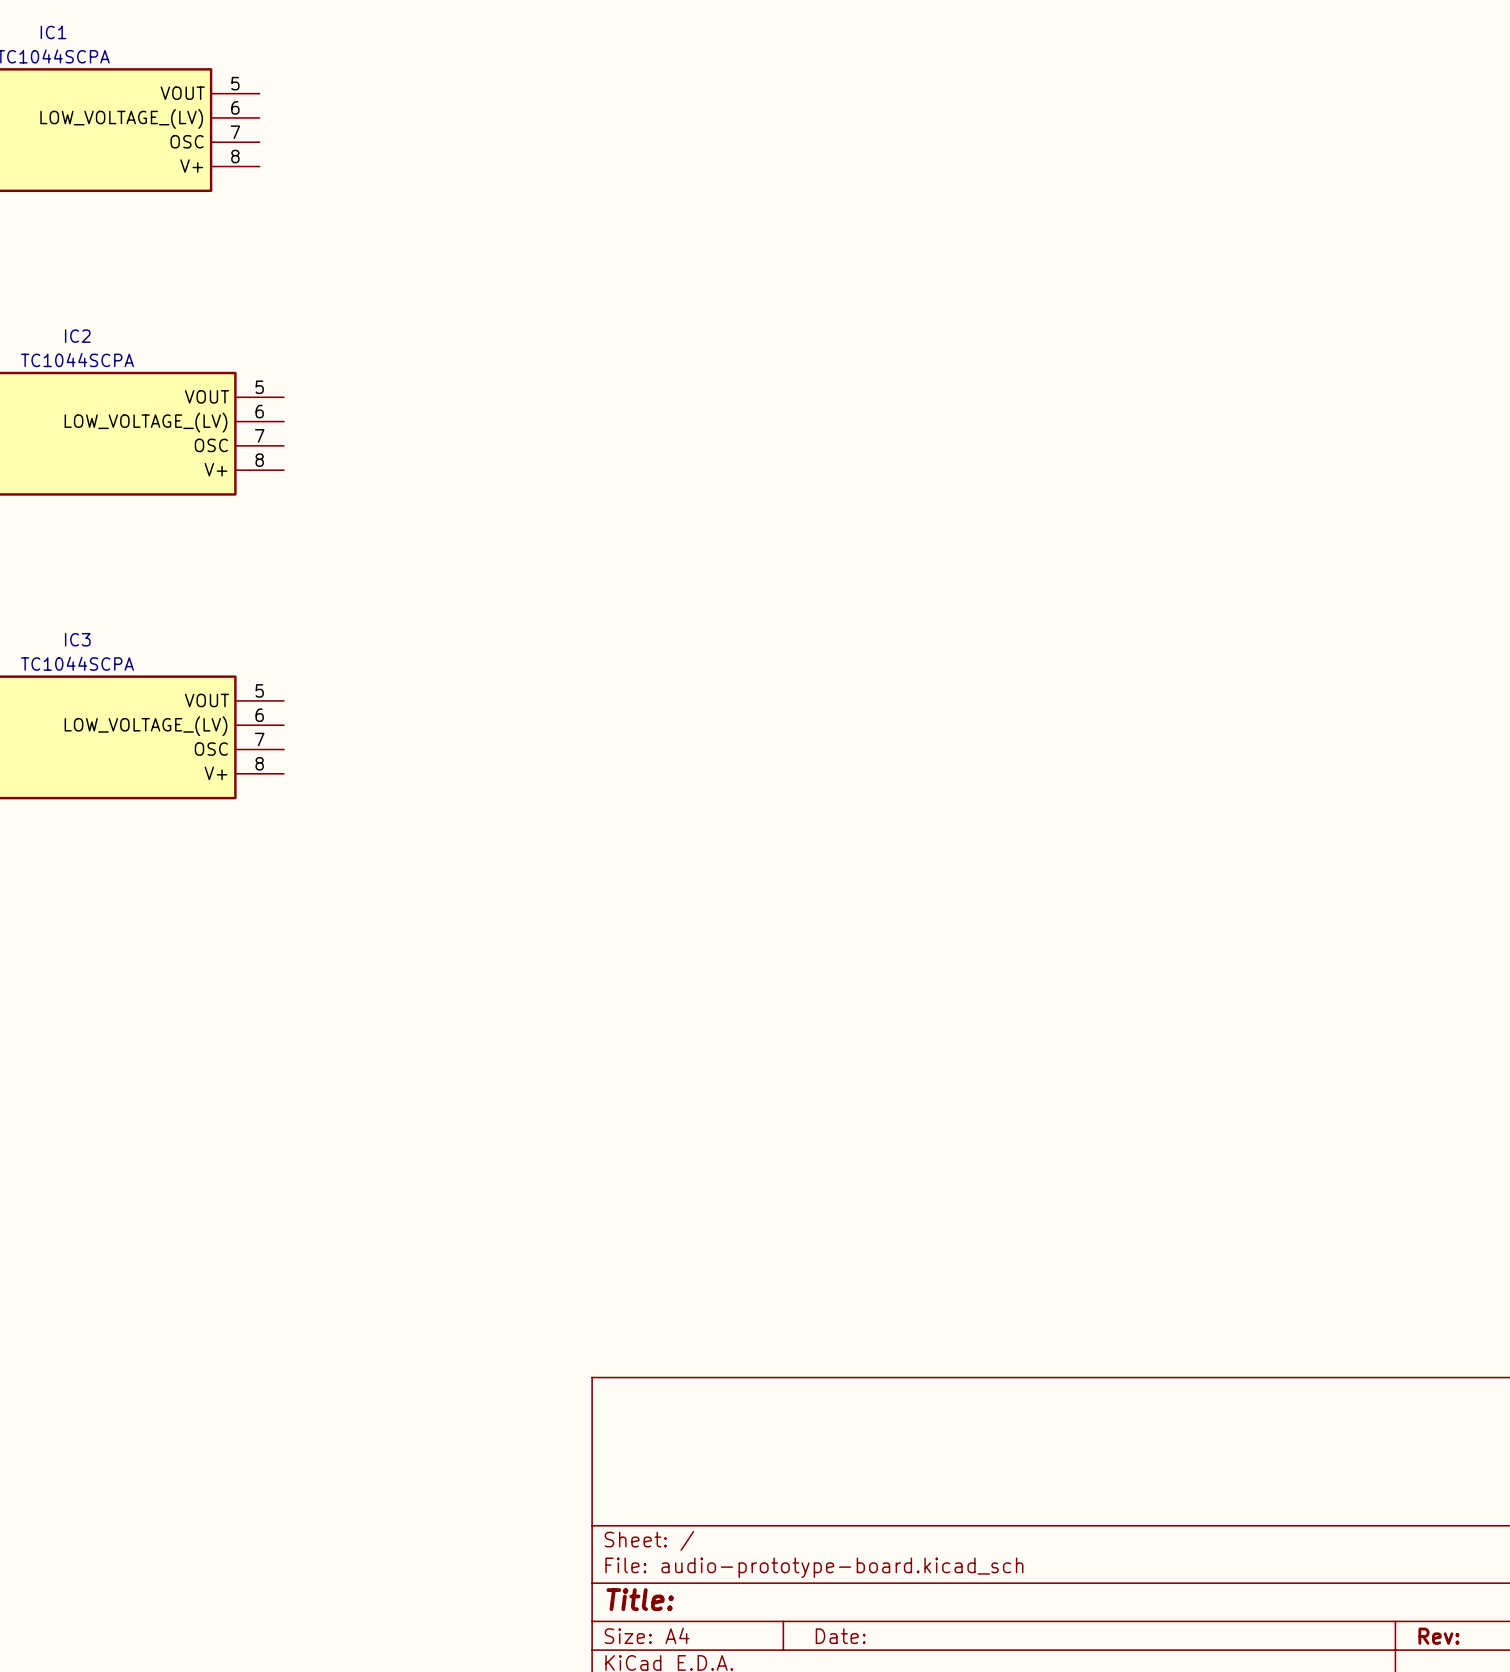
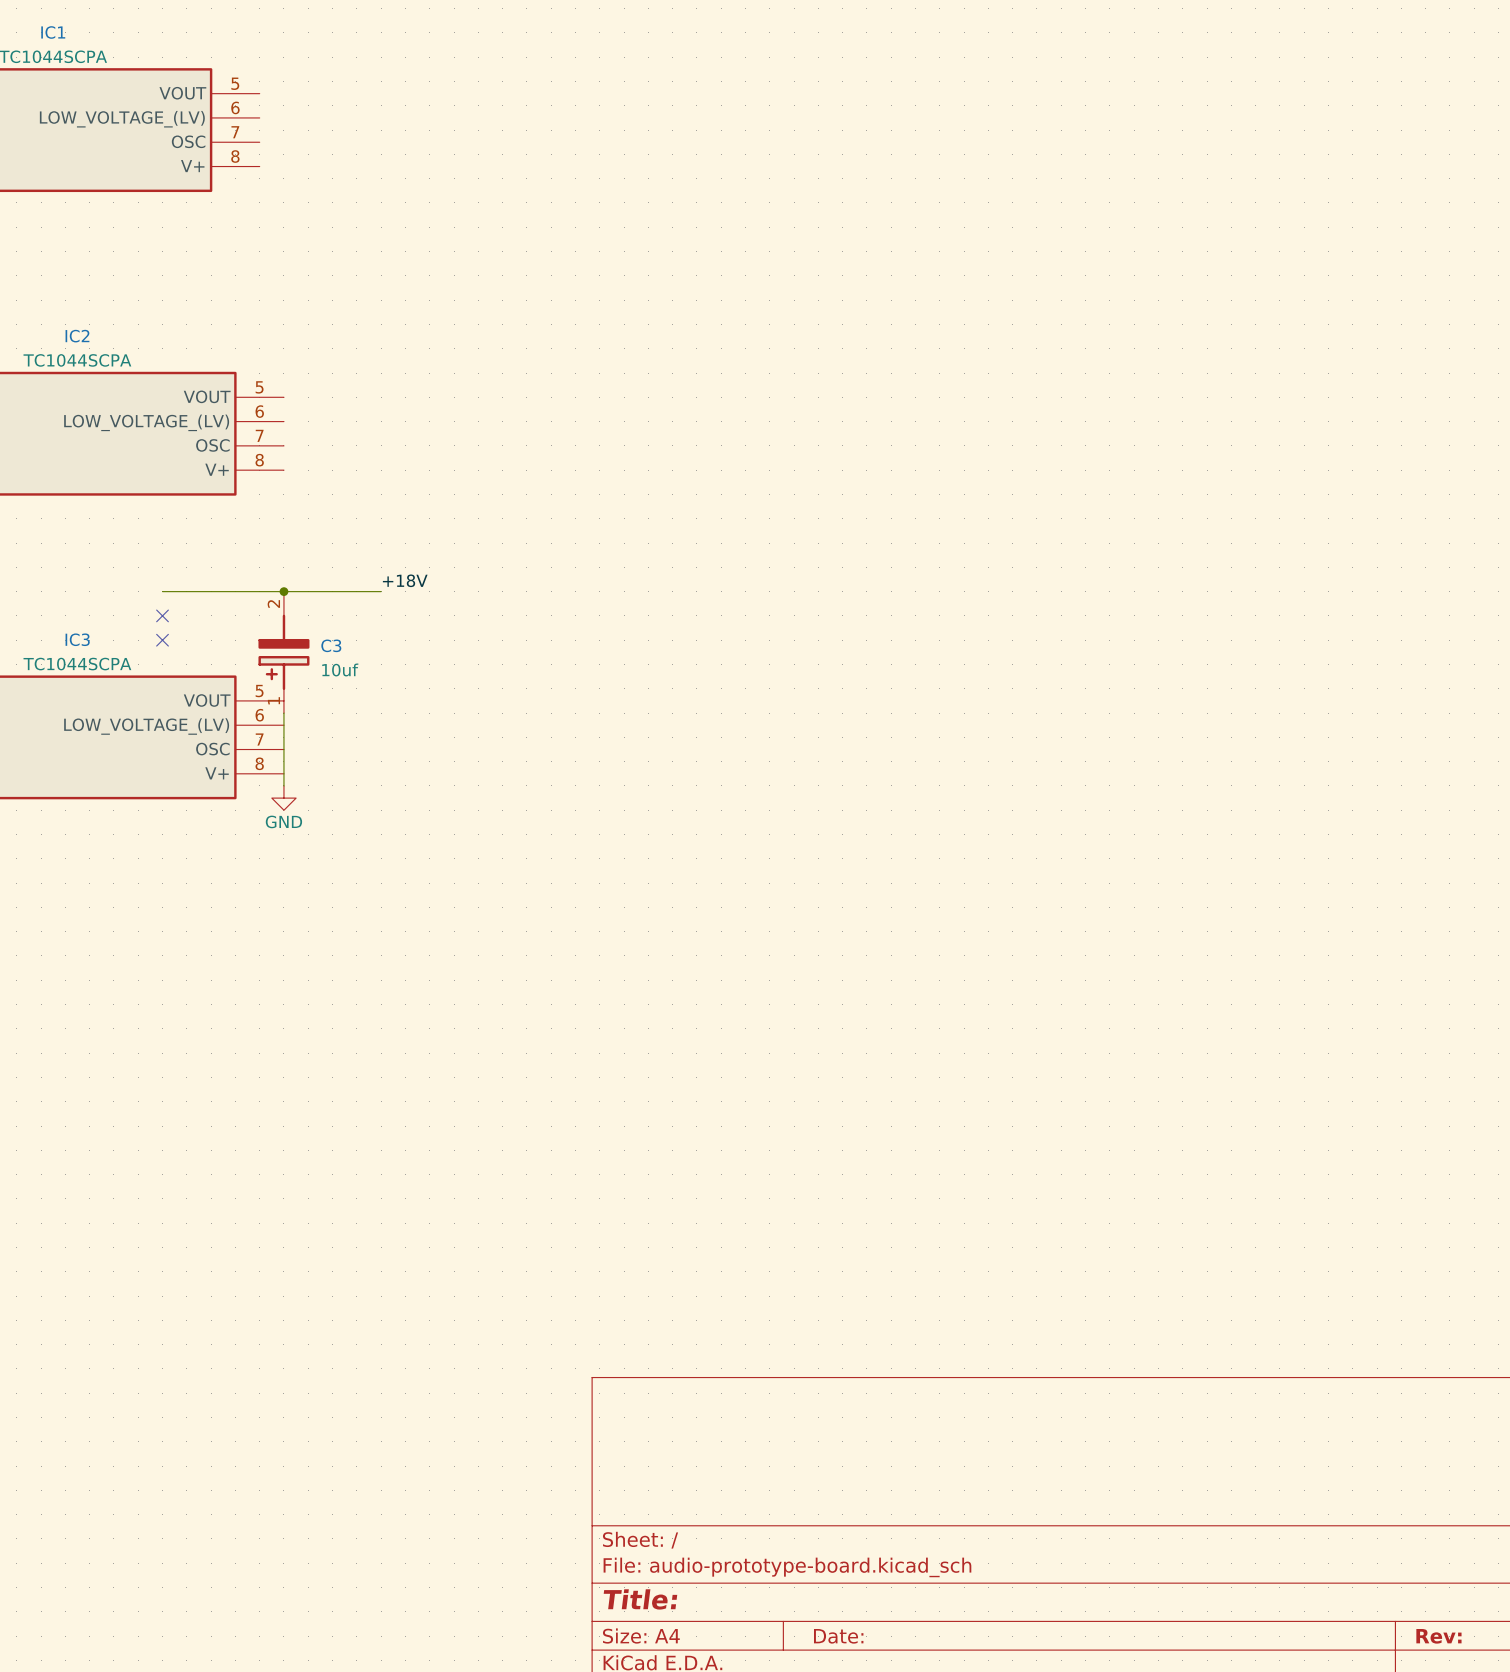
label: none -> +18V (405, 580)
wire: none -> (162, 591) (381, 591)
junction: none -> (283, 591)
no-connect mark: none -> (162, 615)
no-connect mark: none -> (162, 640)
C3: none -> 10uf (283, 652)
wire: none -> (283, 713) (283, 785)
power symbol: none -> GND (283, 798)

